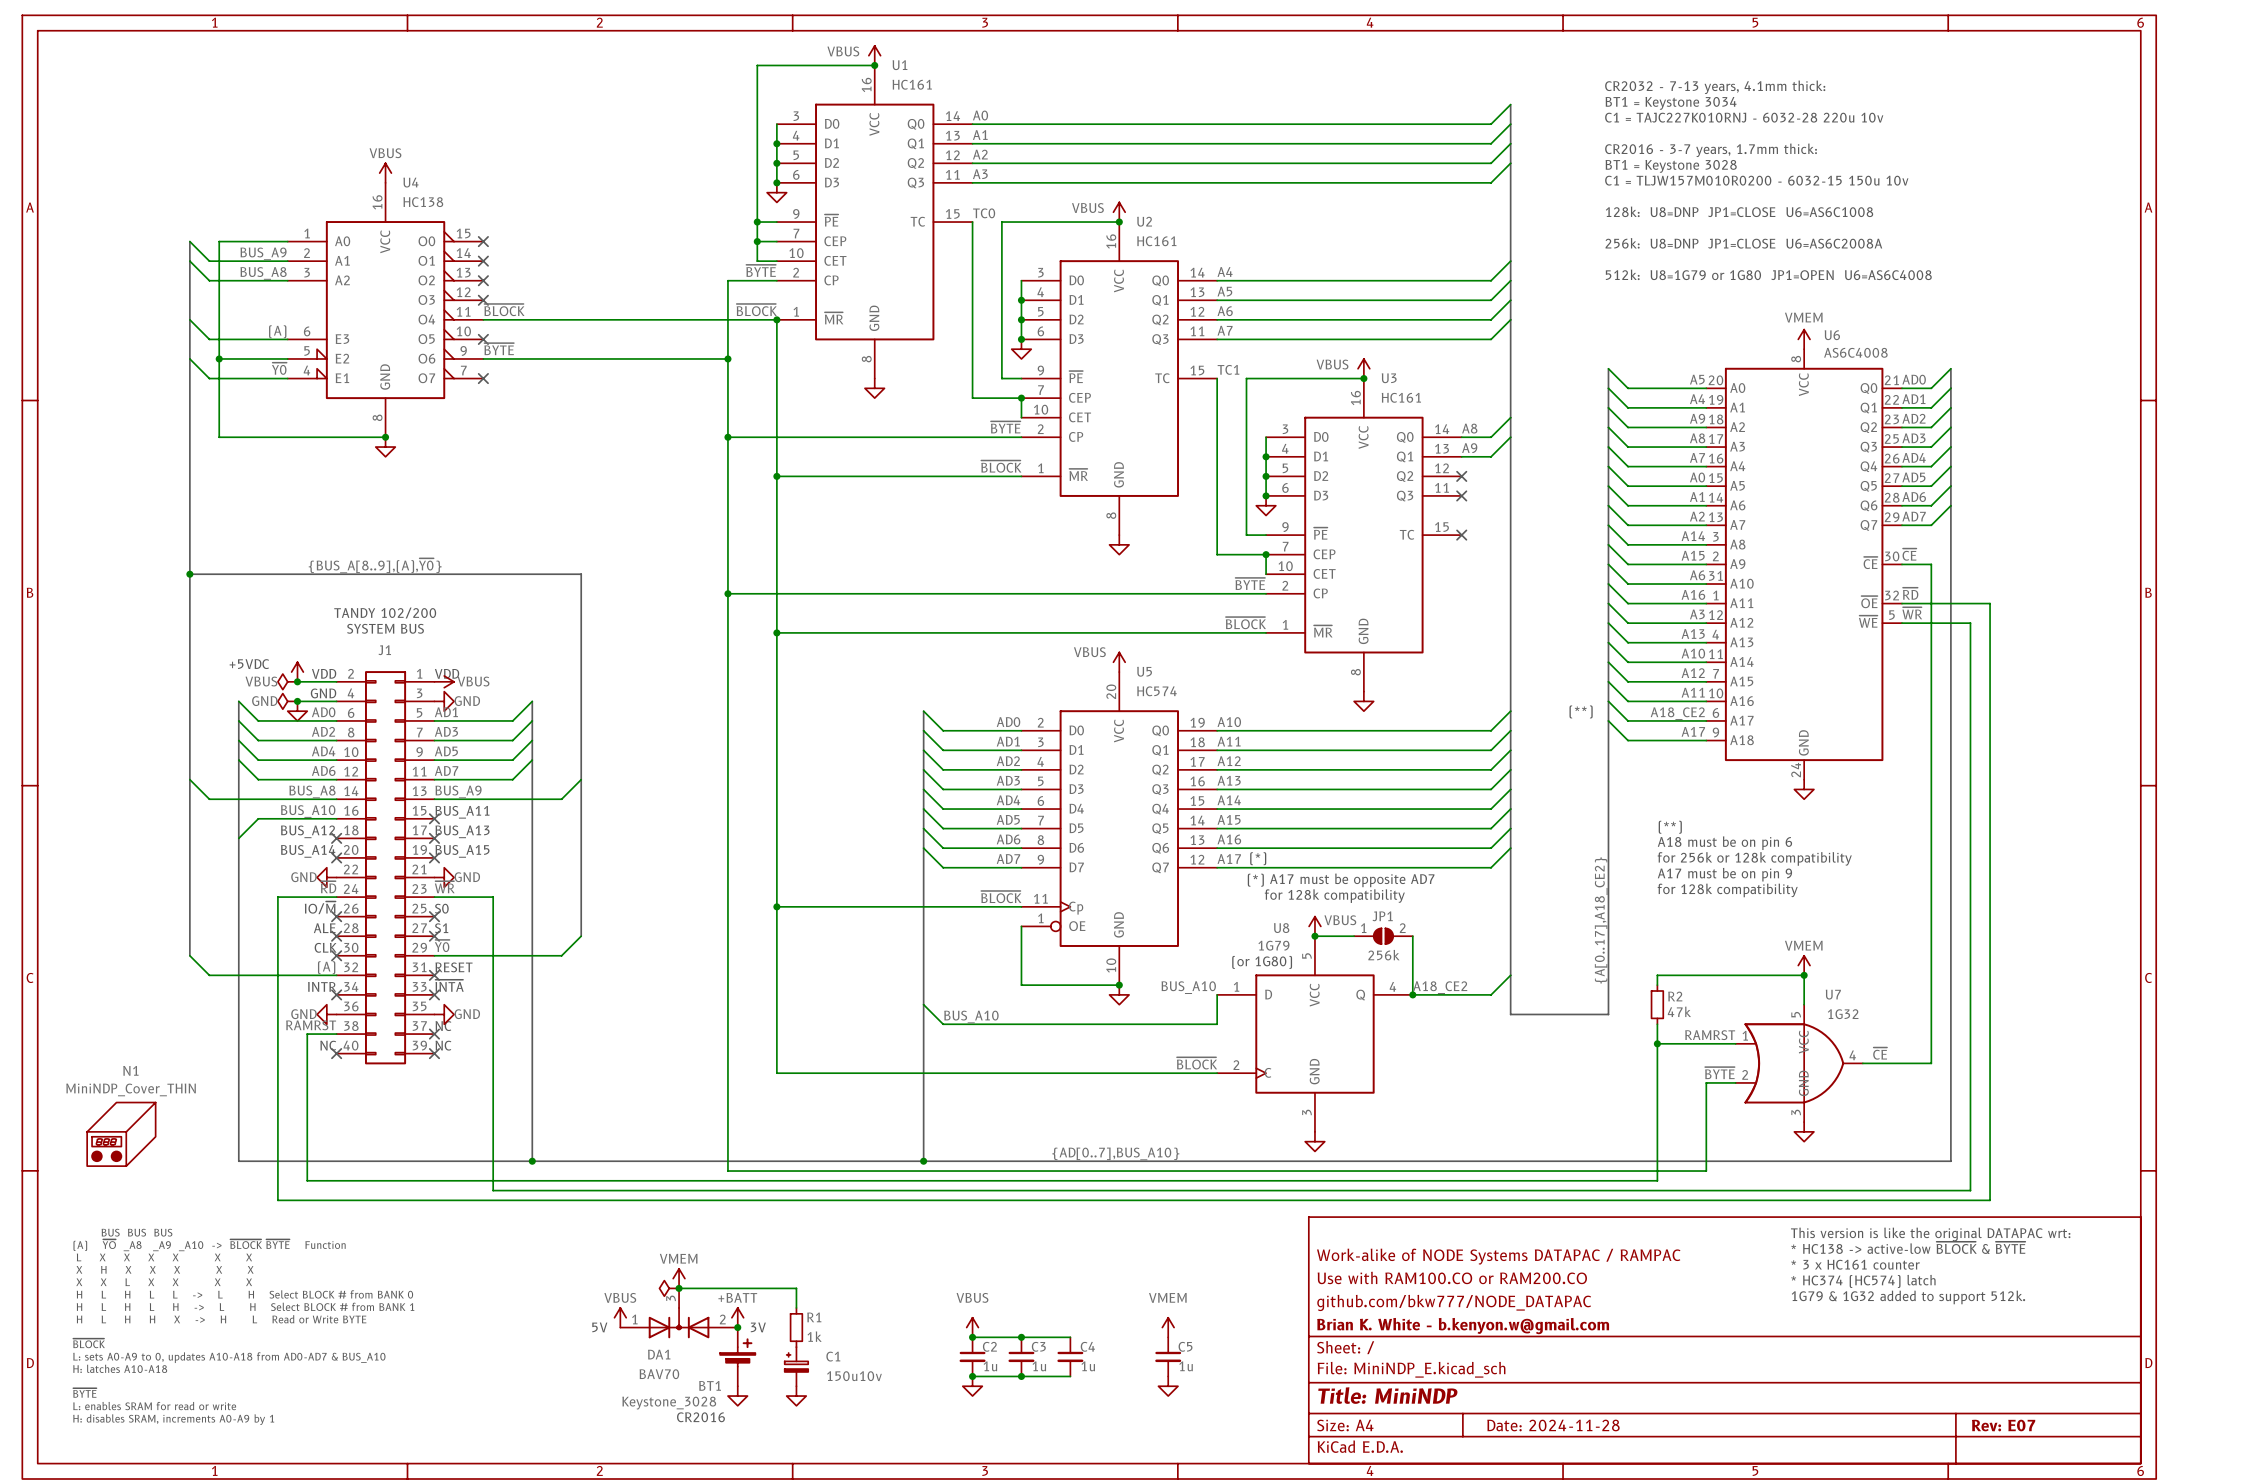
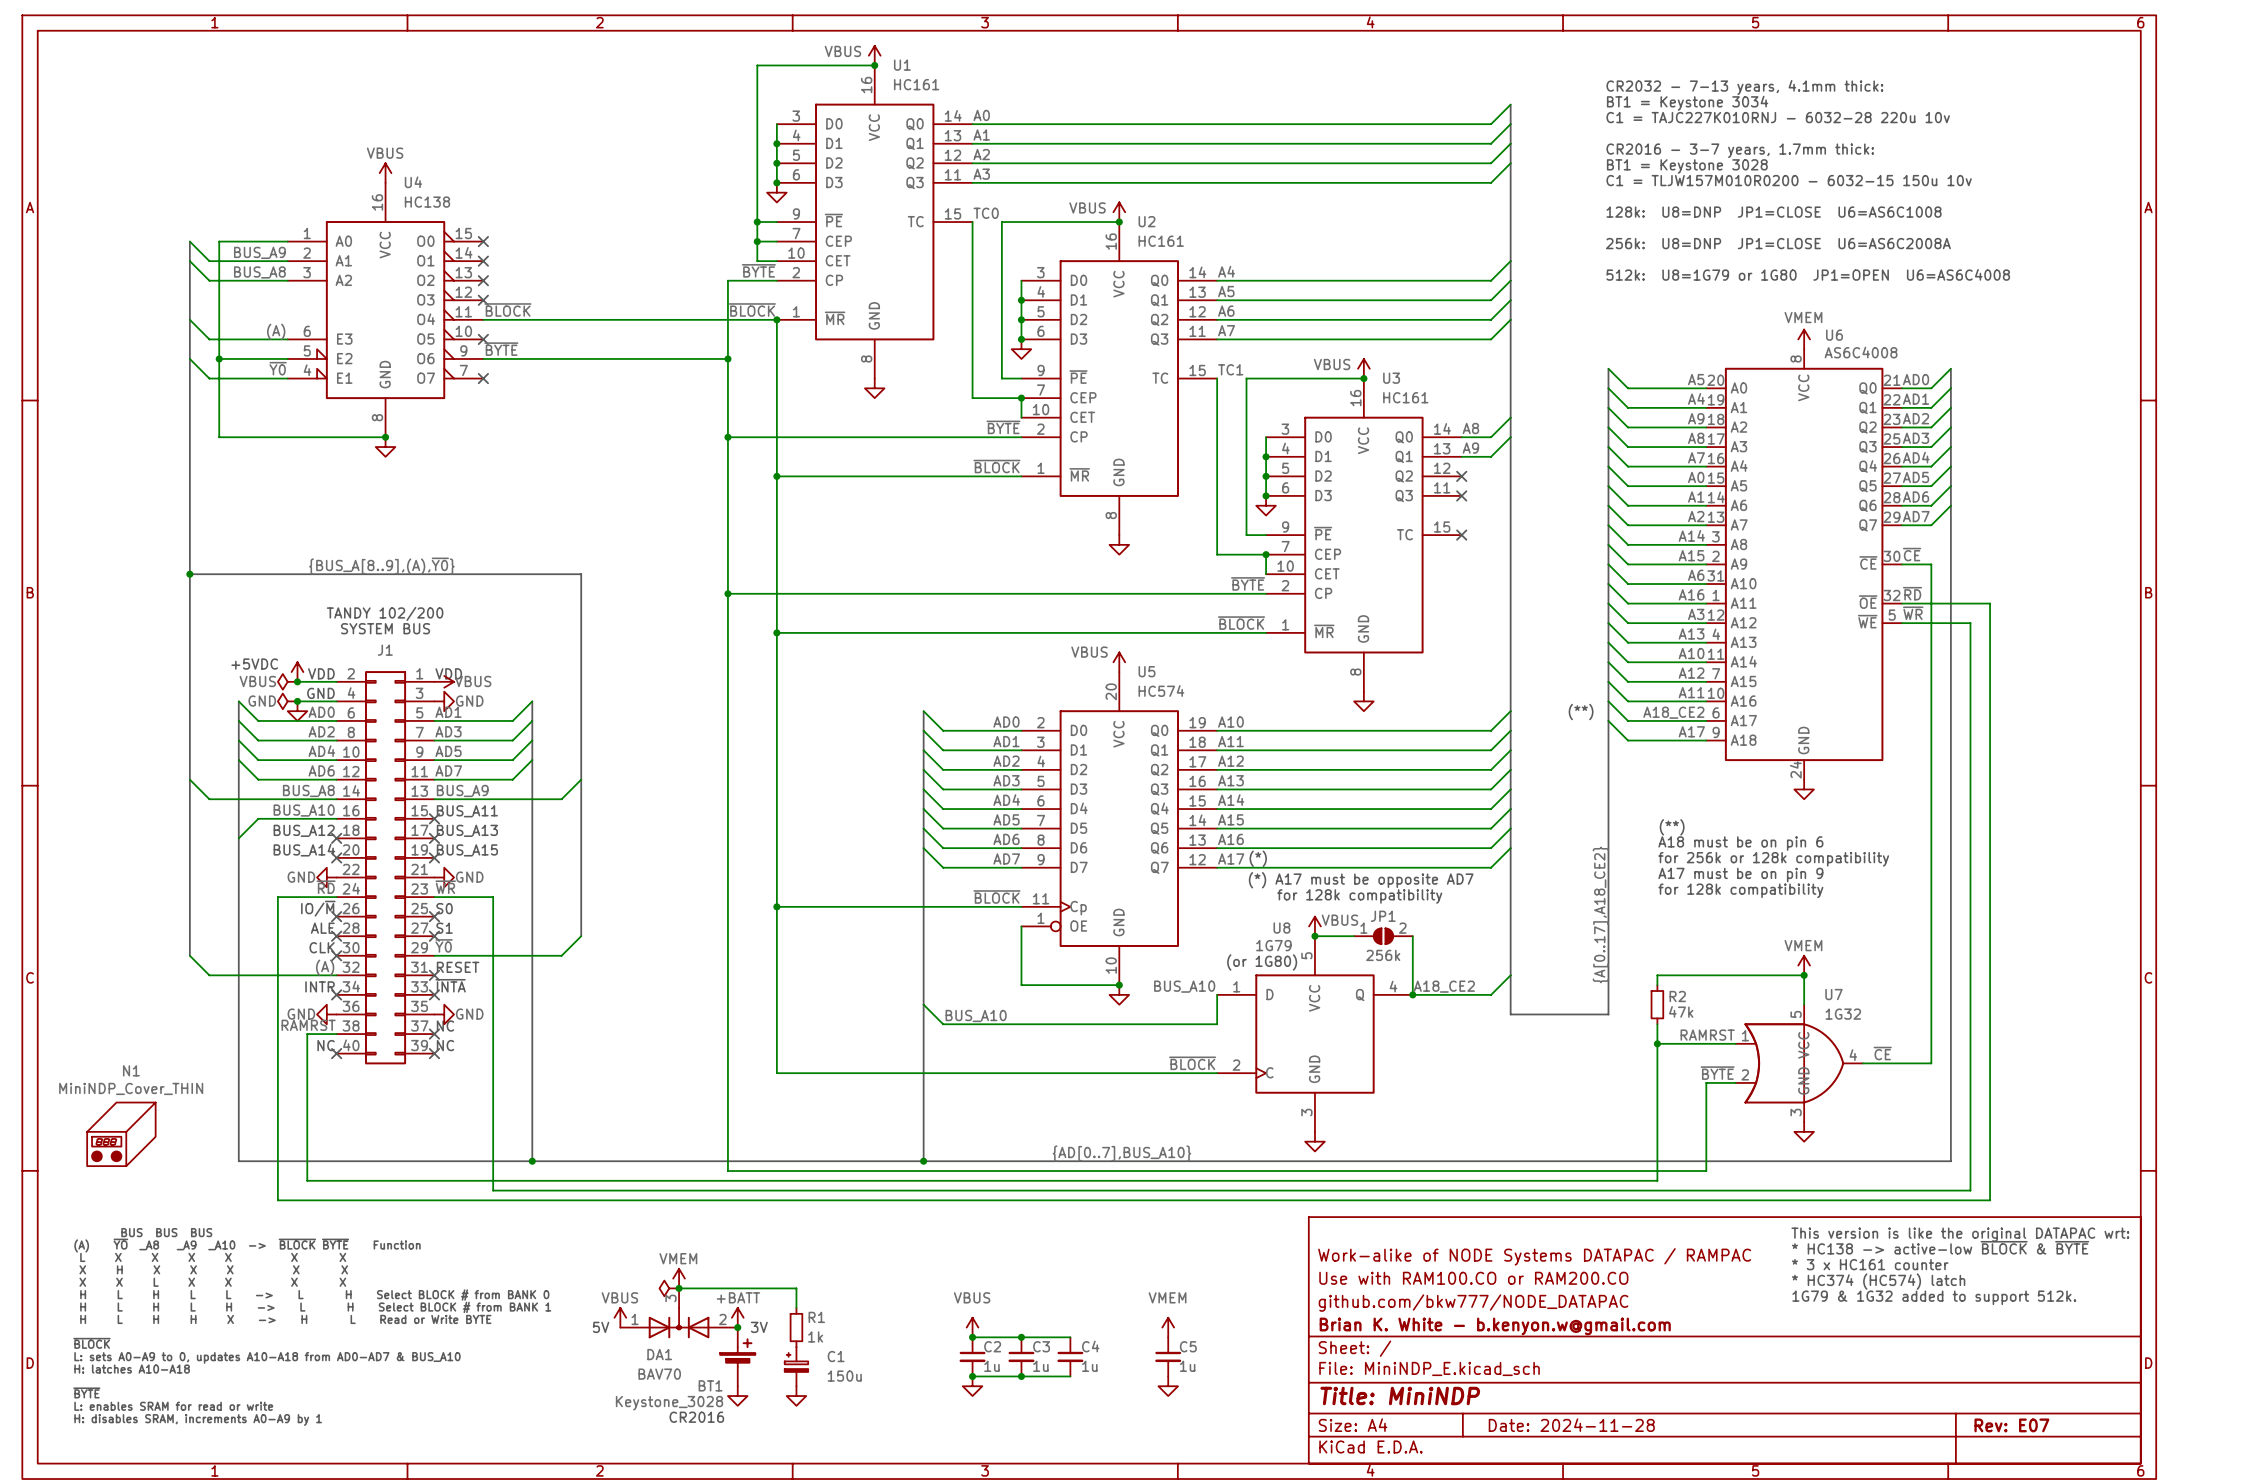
C1 value: 150u10v (854, 1376) -> 150u (844, 1376)

